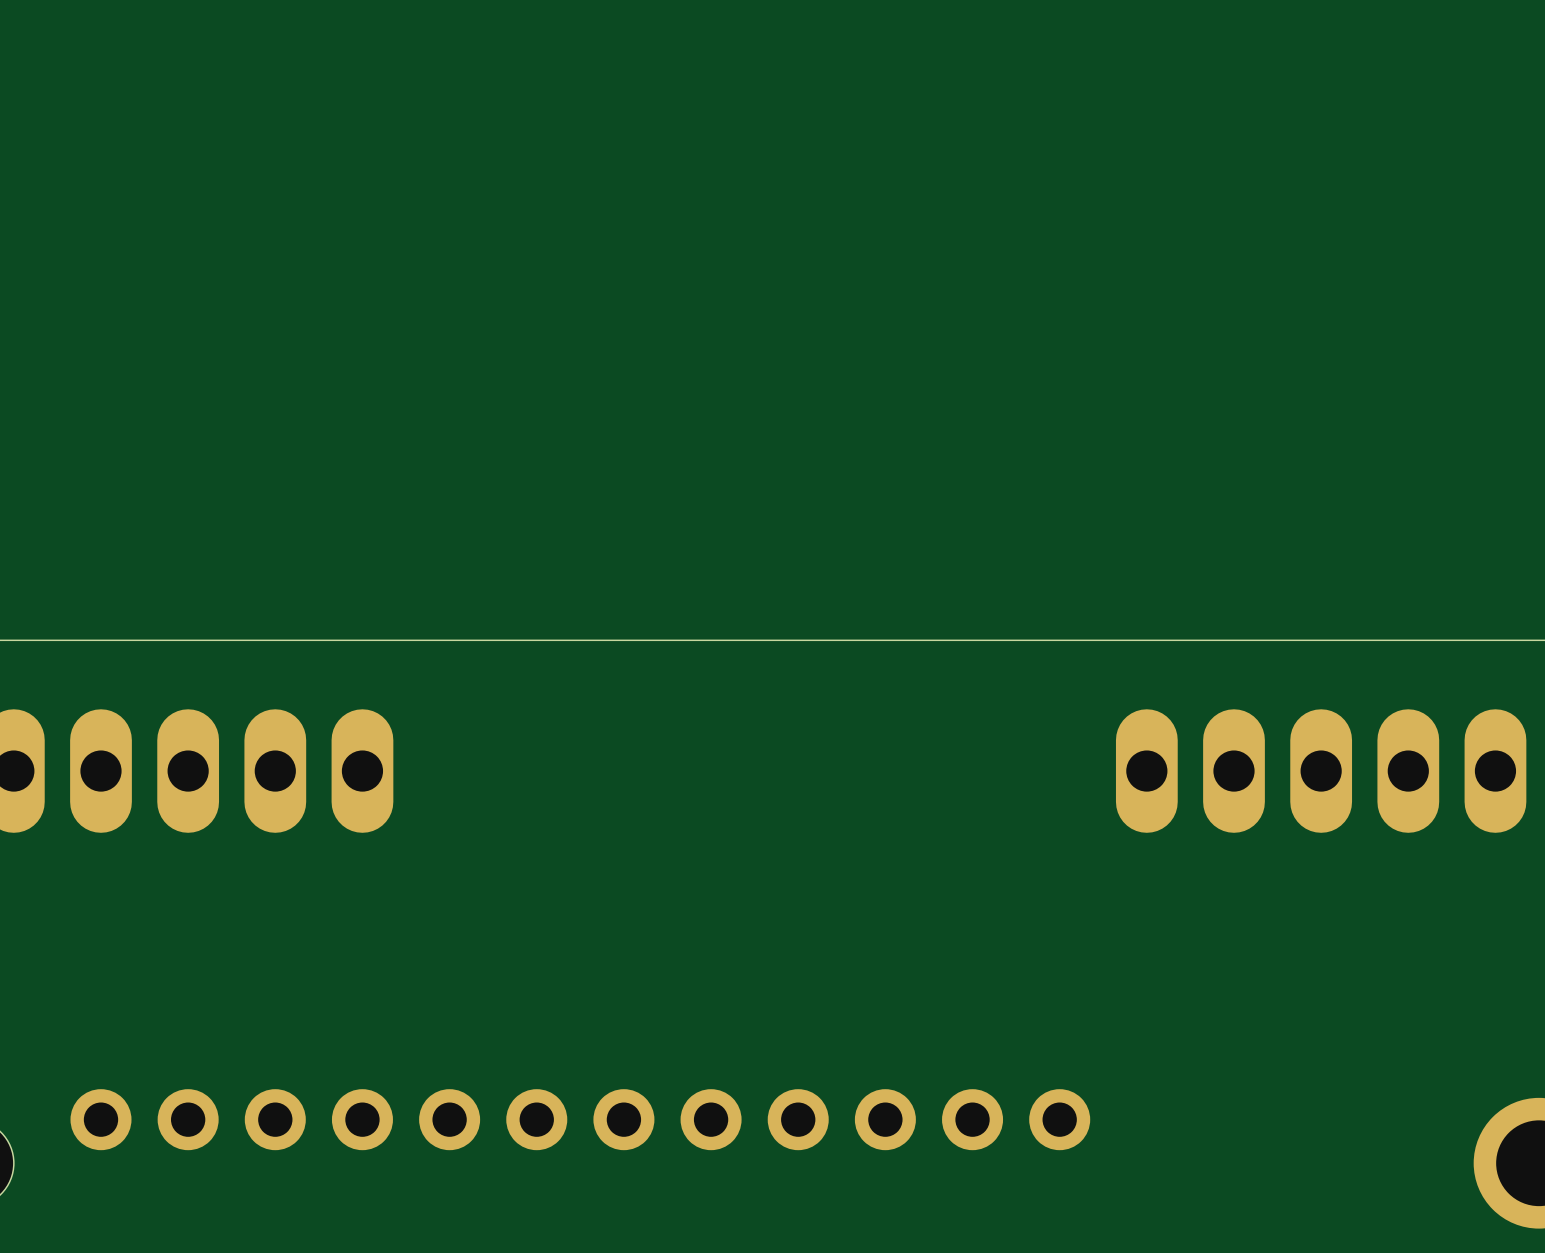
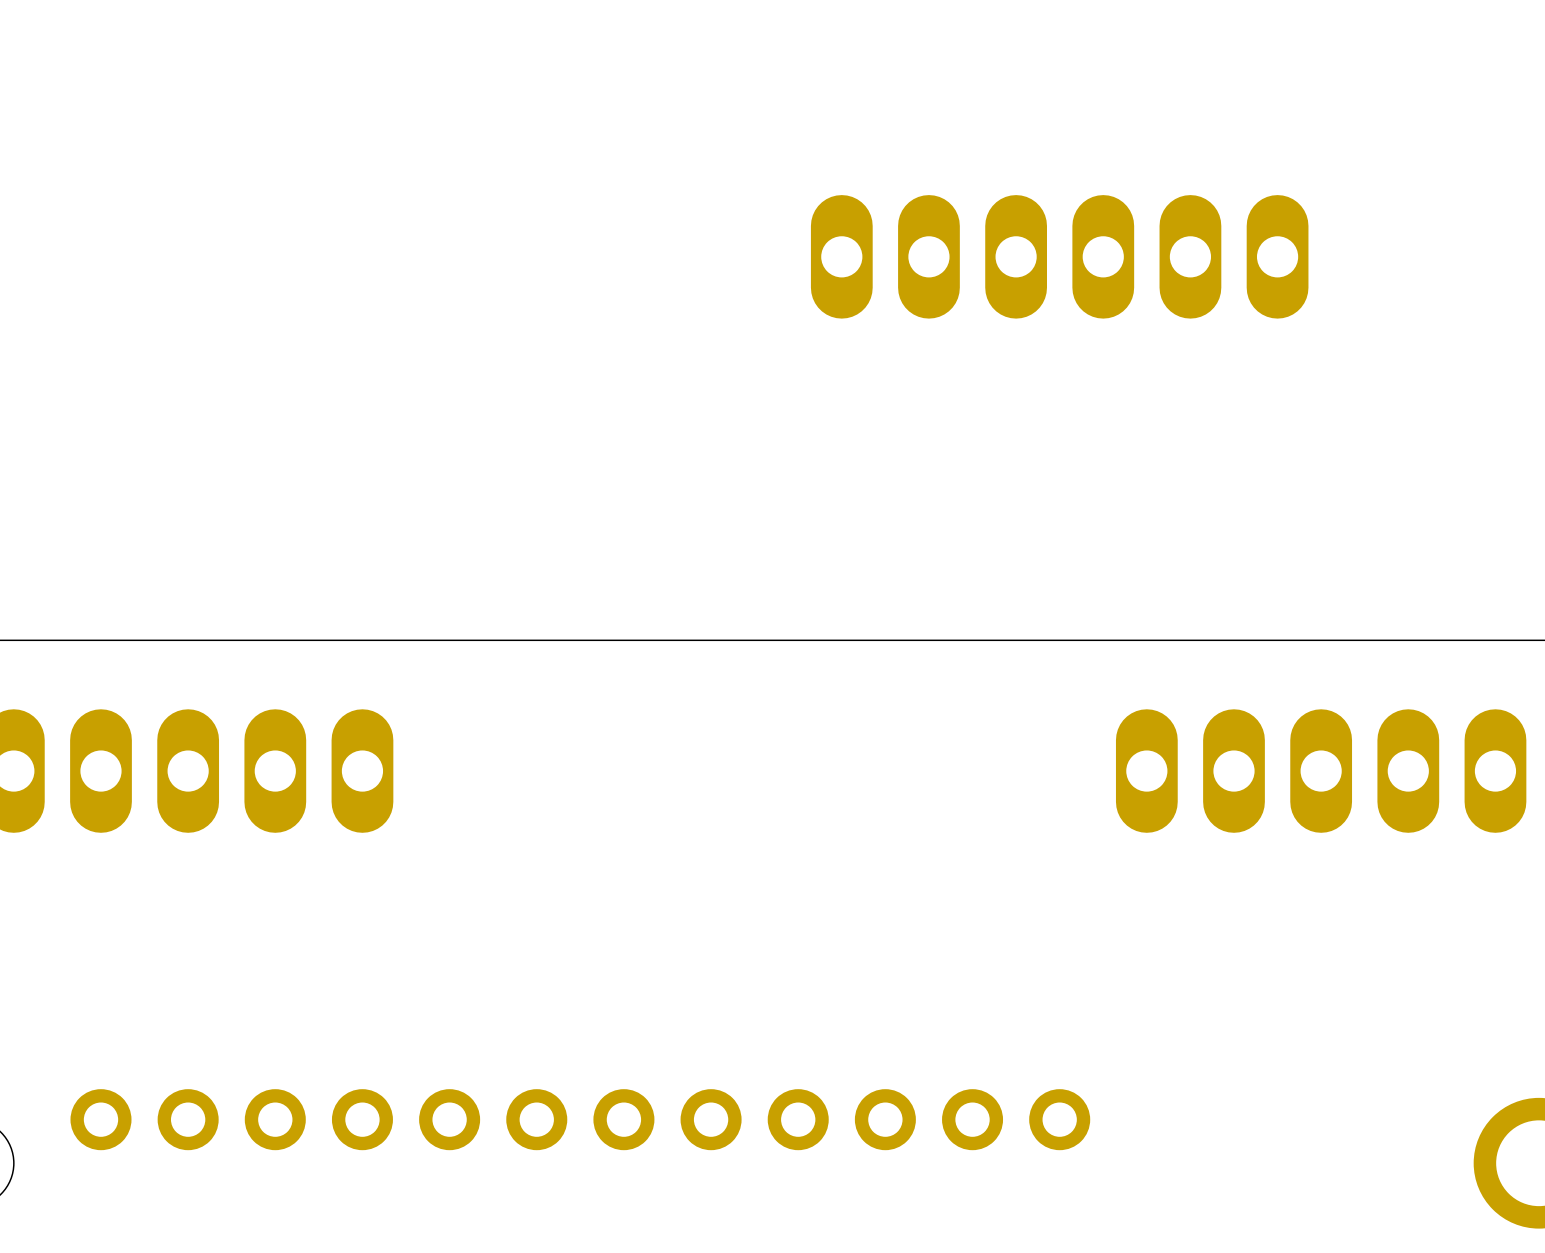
part: none -> (1059, 256)

